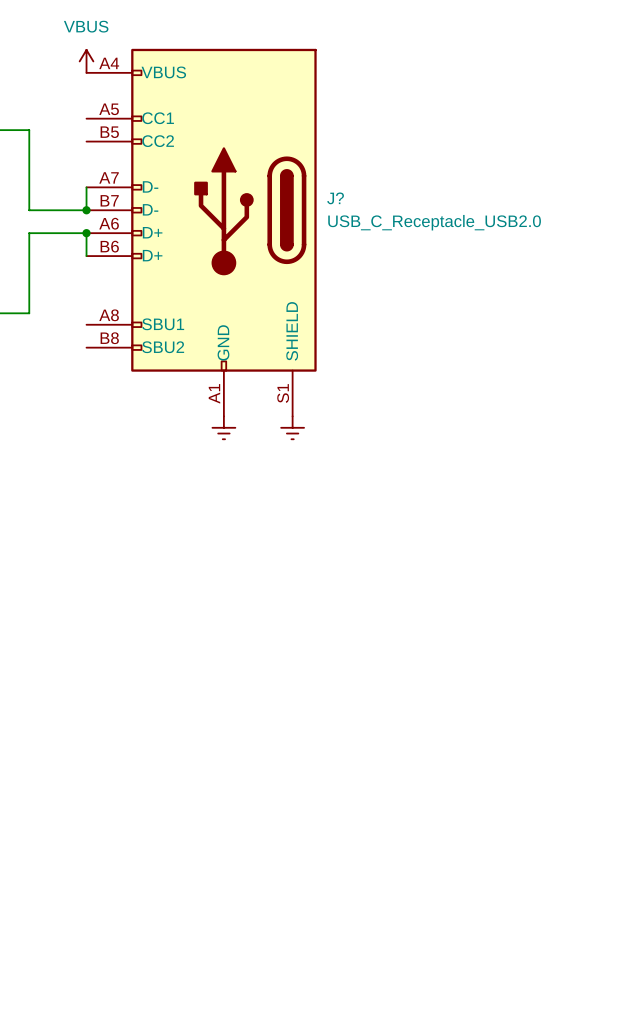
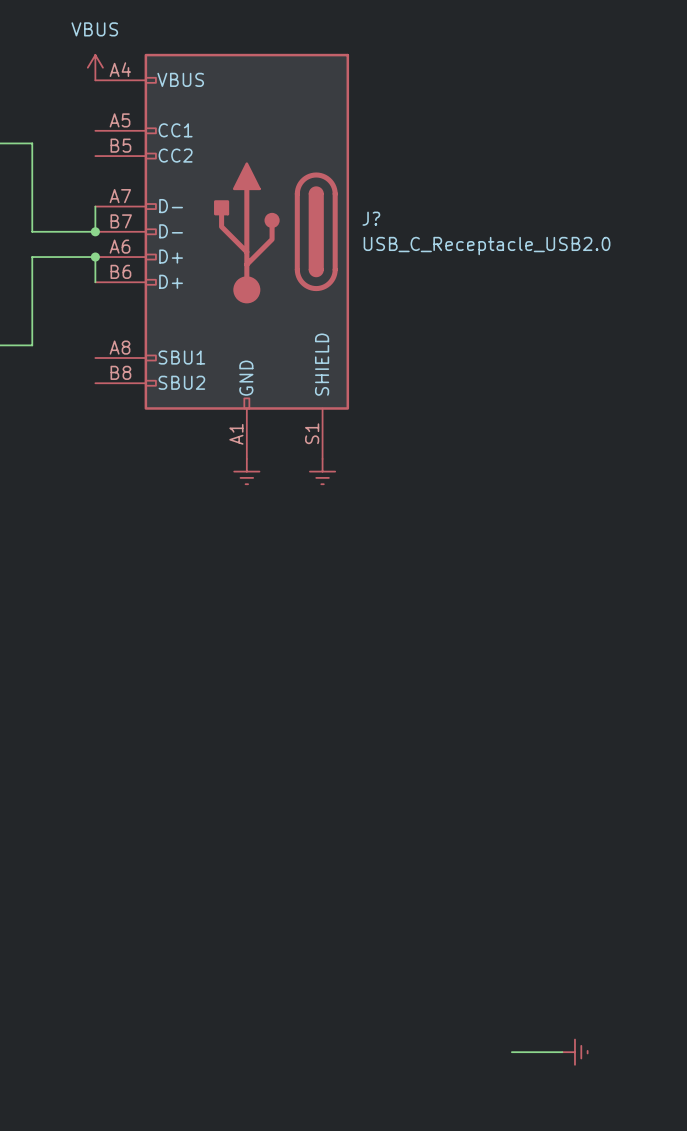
wire: none -> (511, 1052) (562, 1052)
power symbol: none -> (574, 1052)

